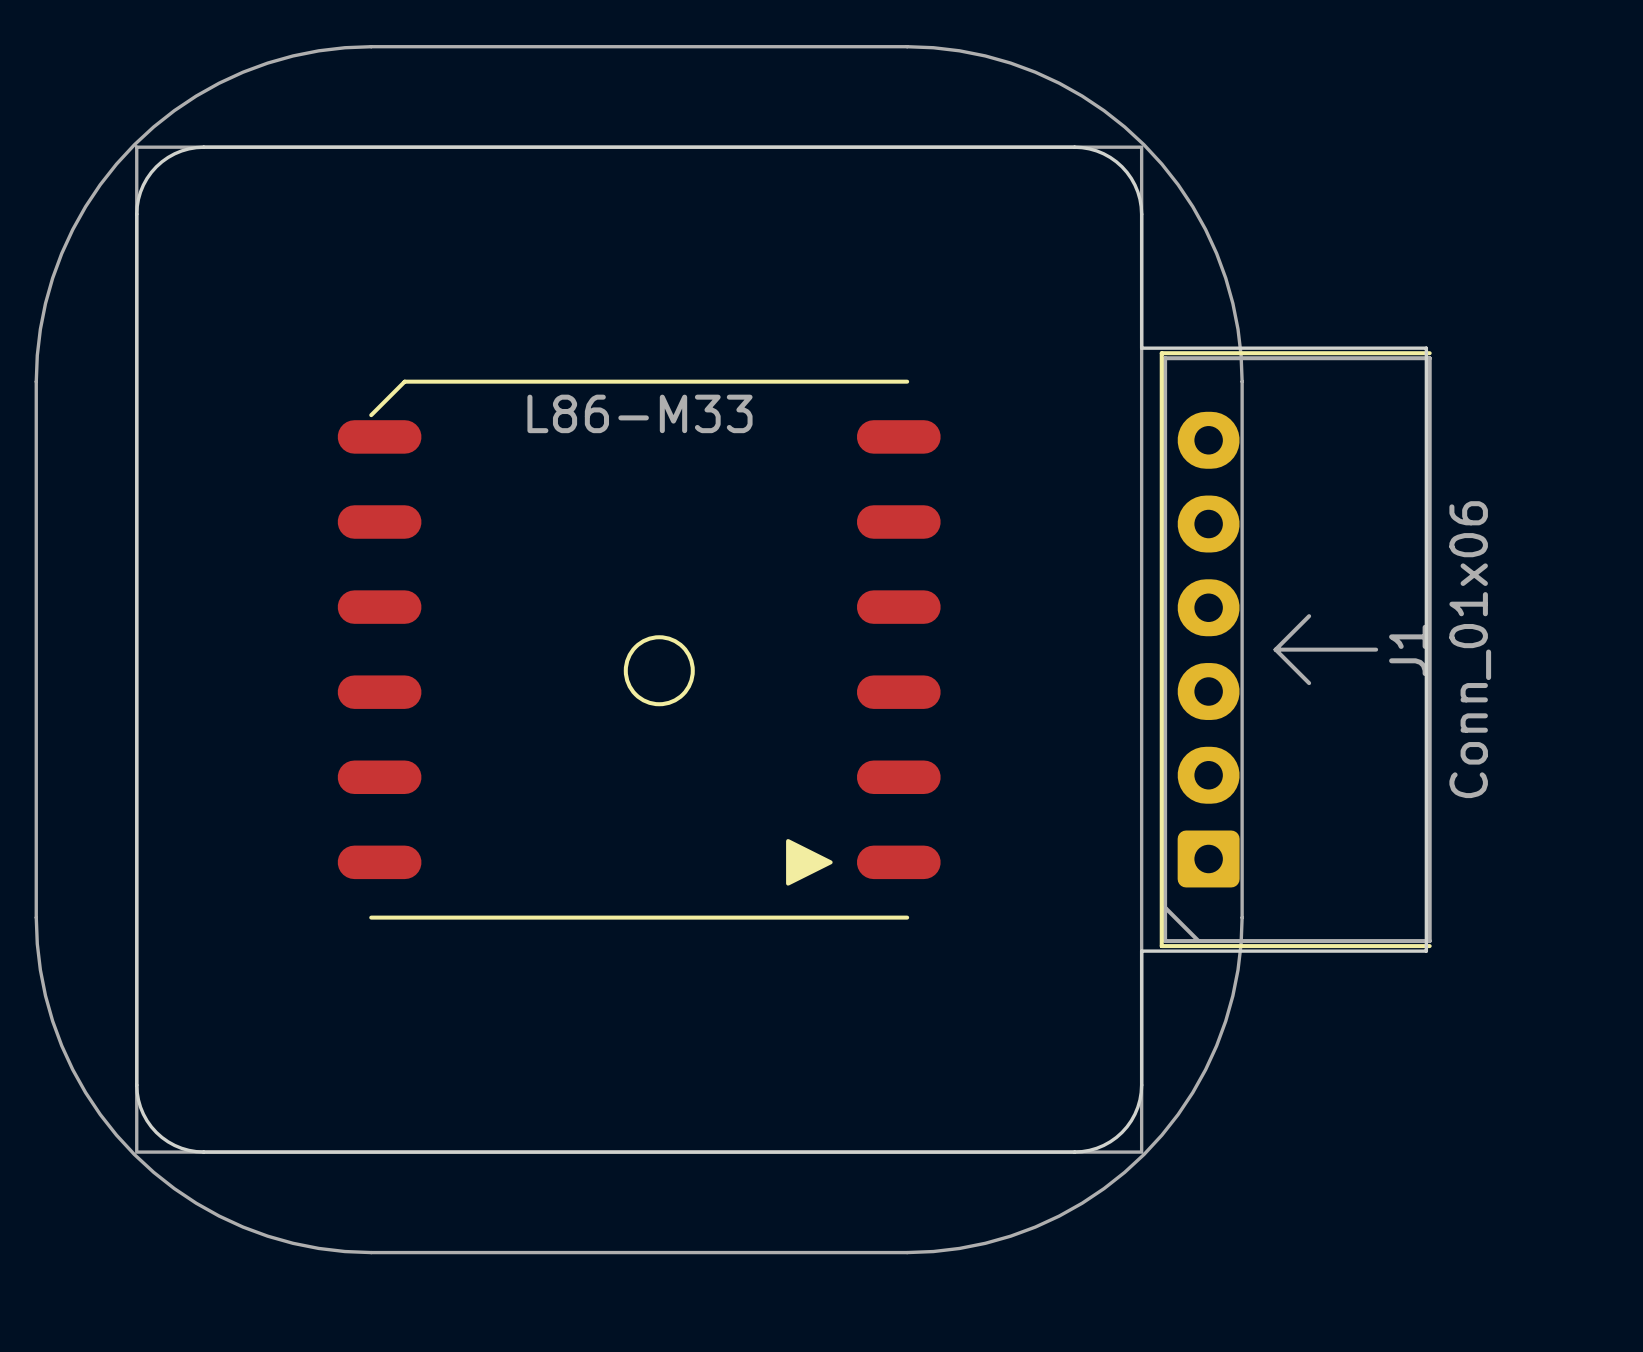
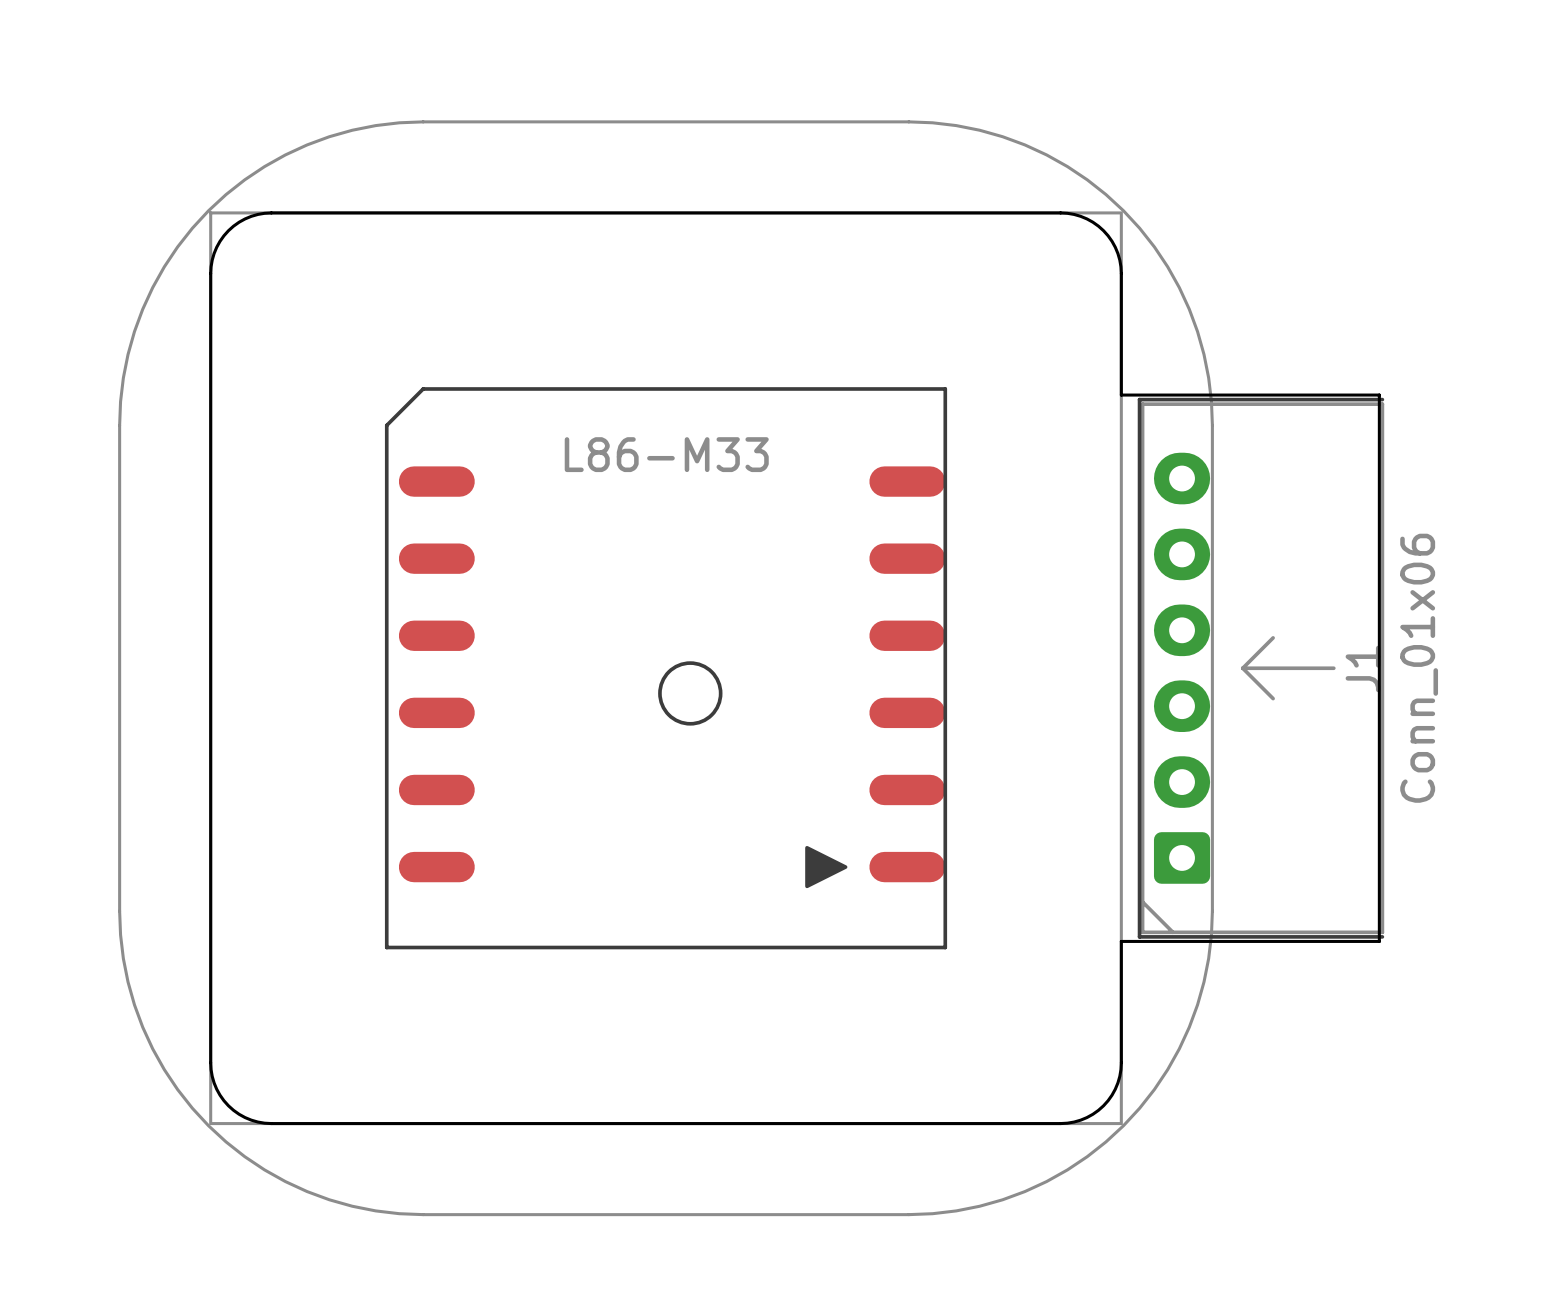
part footprint: [34, 45, 1244, 1255] -> [118, 120, 1214, 1217]

